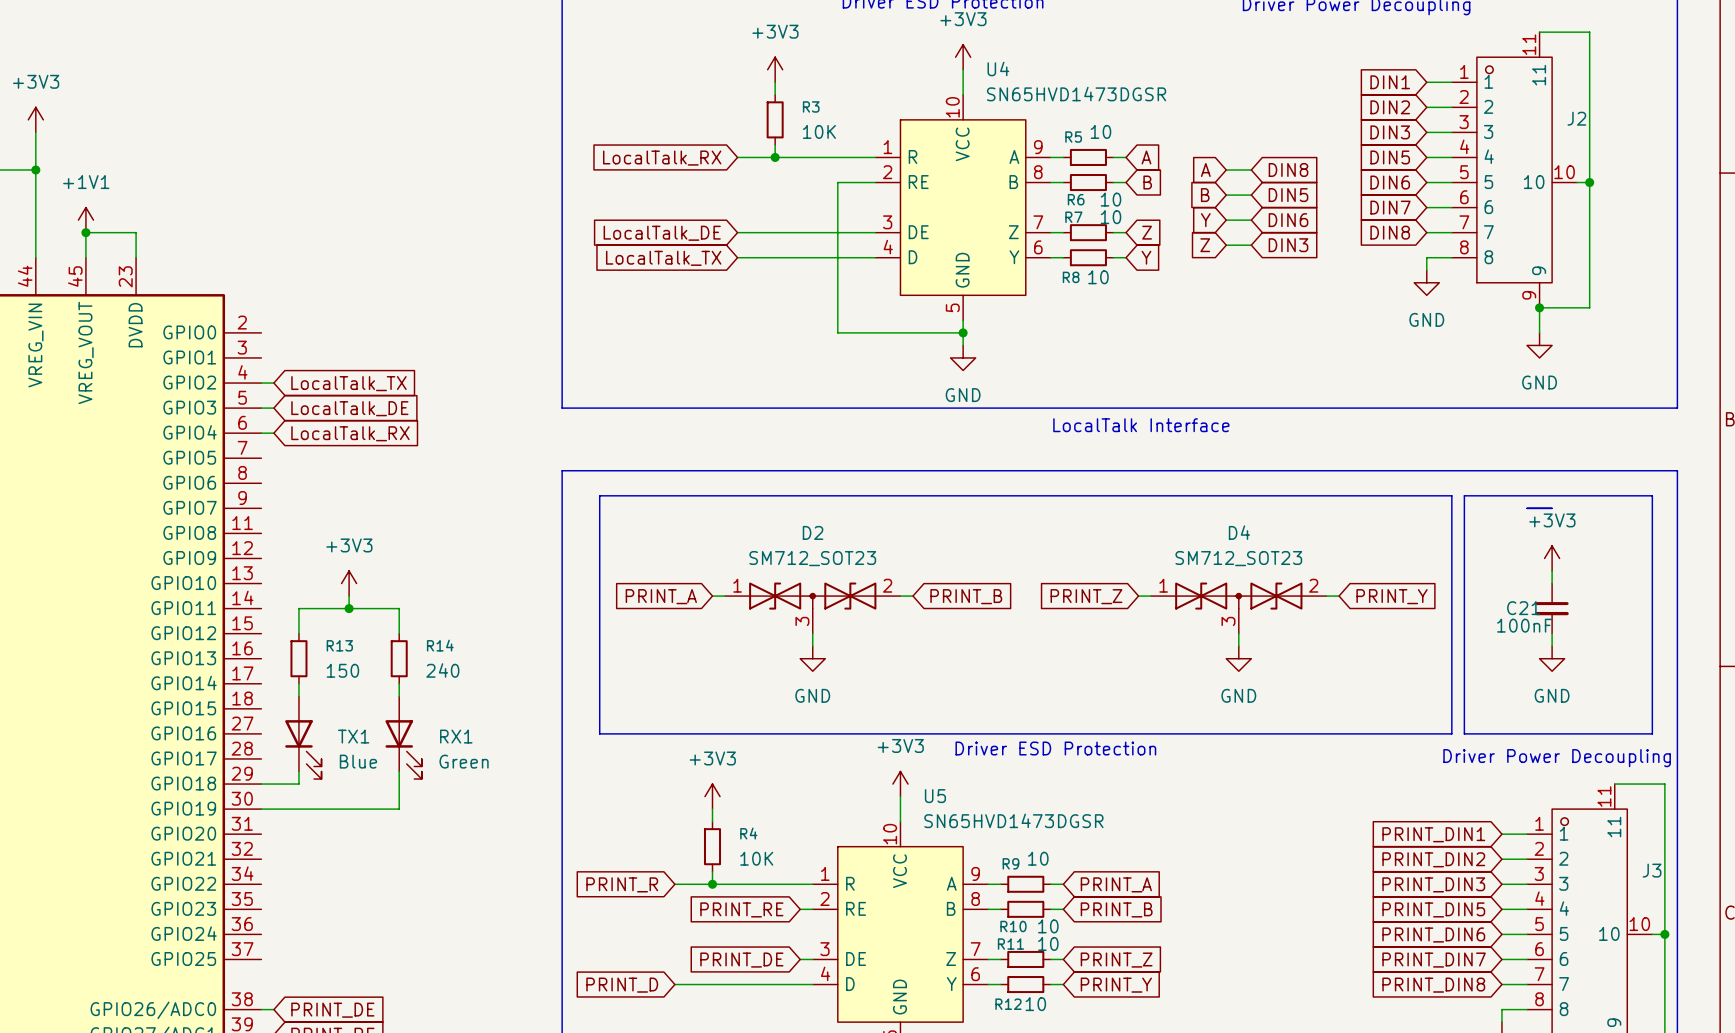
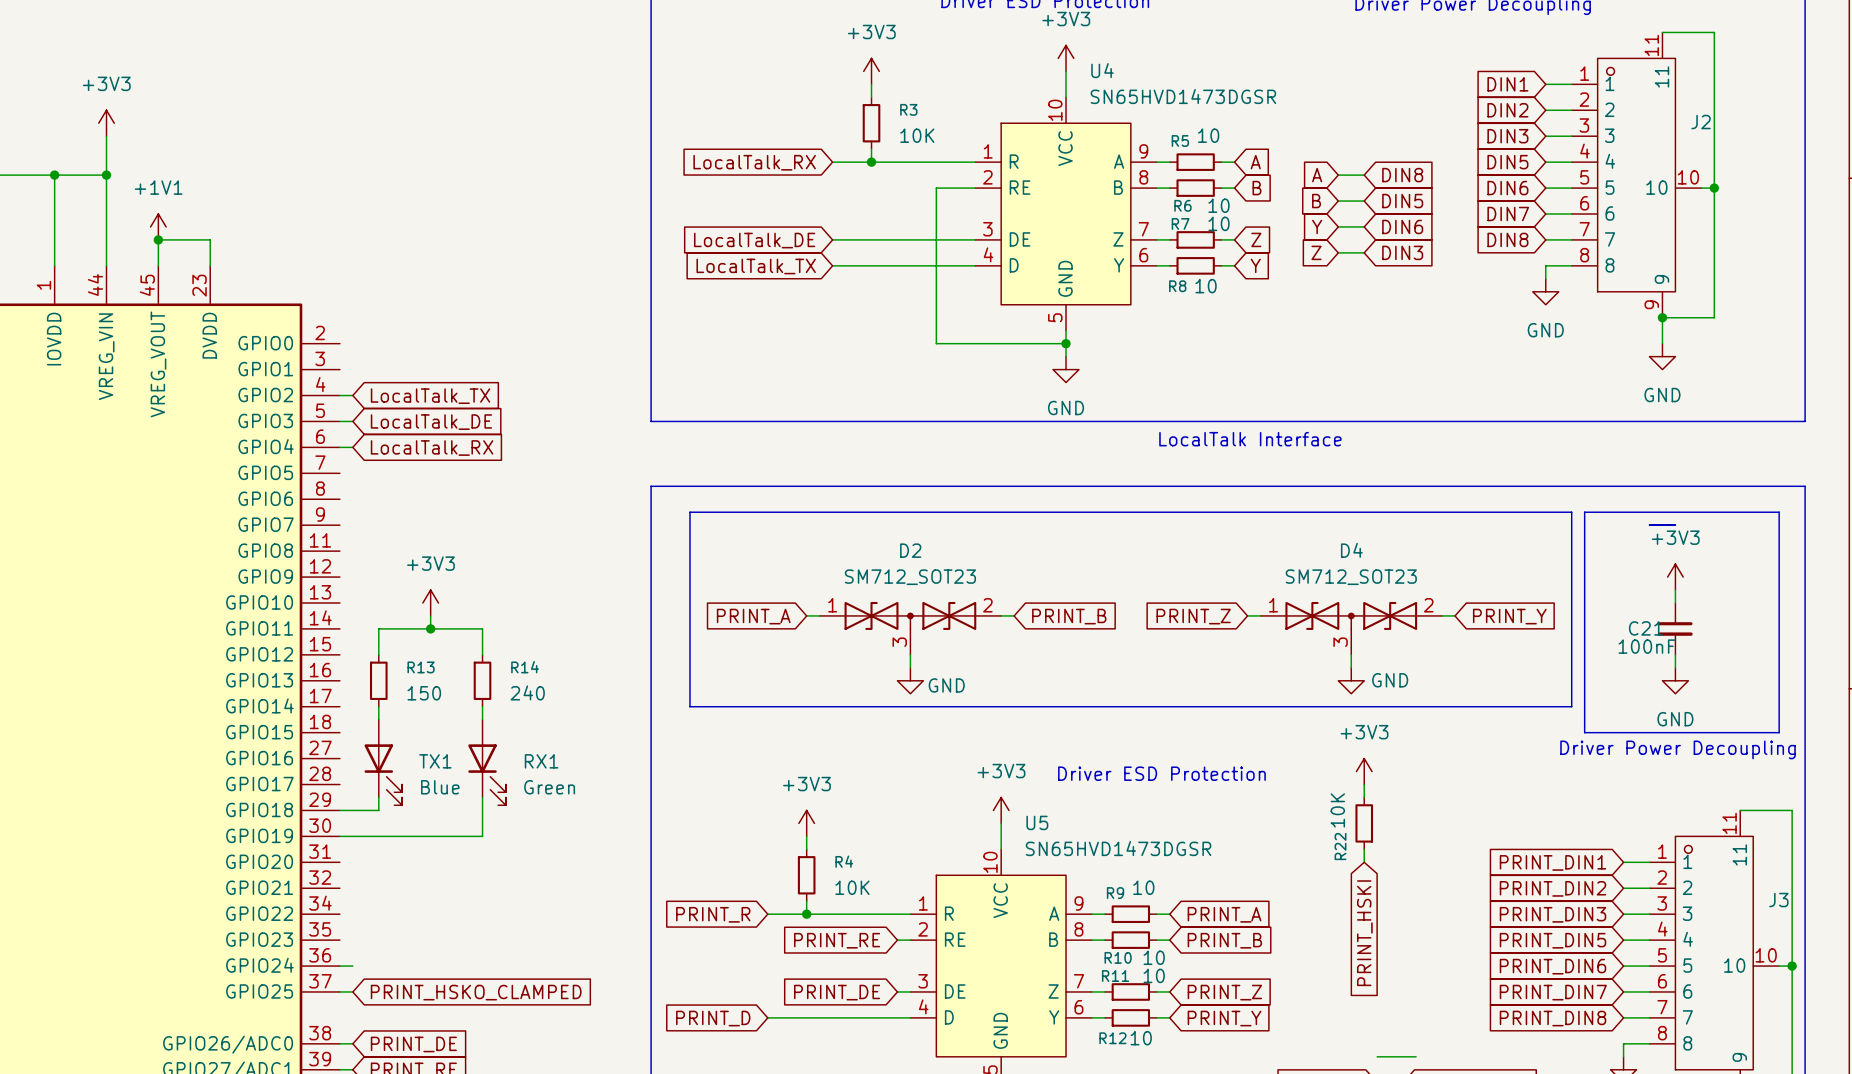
line: (599, 683) (599, 733) (1451, 733) (1451, 683) -> (689, 706) (1571, 706)
power symbol text position: GND (812, 695) -> GND (946, 685)
power symbol text position: GND (1238, 695) -> GND (1390, 680)
line: (1464, 708) (1464, 733) (1652, 733) (1652, 708) -> (1584, 732) (1779, 732)
power symbol: none -> +3V3 (1364, 771)
wire: none -> (1364, 784) (1364, 797)
text position: Driver Power Decoupling (1557, 758) -> Driver Power Decoupling (1678, 749)
R22: none -> 10K (1364, 823)
wire: none -> (1364, 849) (1364, 862)
global label: none -> PRINT_HSKI (1364, 933)
wire: none -> (339, 966) (352, 966)
wire: none -> (339, 991) (352, 991)
global label: none -> PRINT_HSKO_CLAMPED (476, 992)
wire: none -> (1377, 1056) (1416, 1056)

